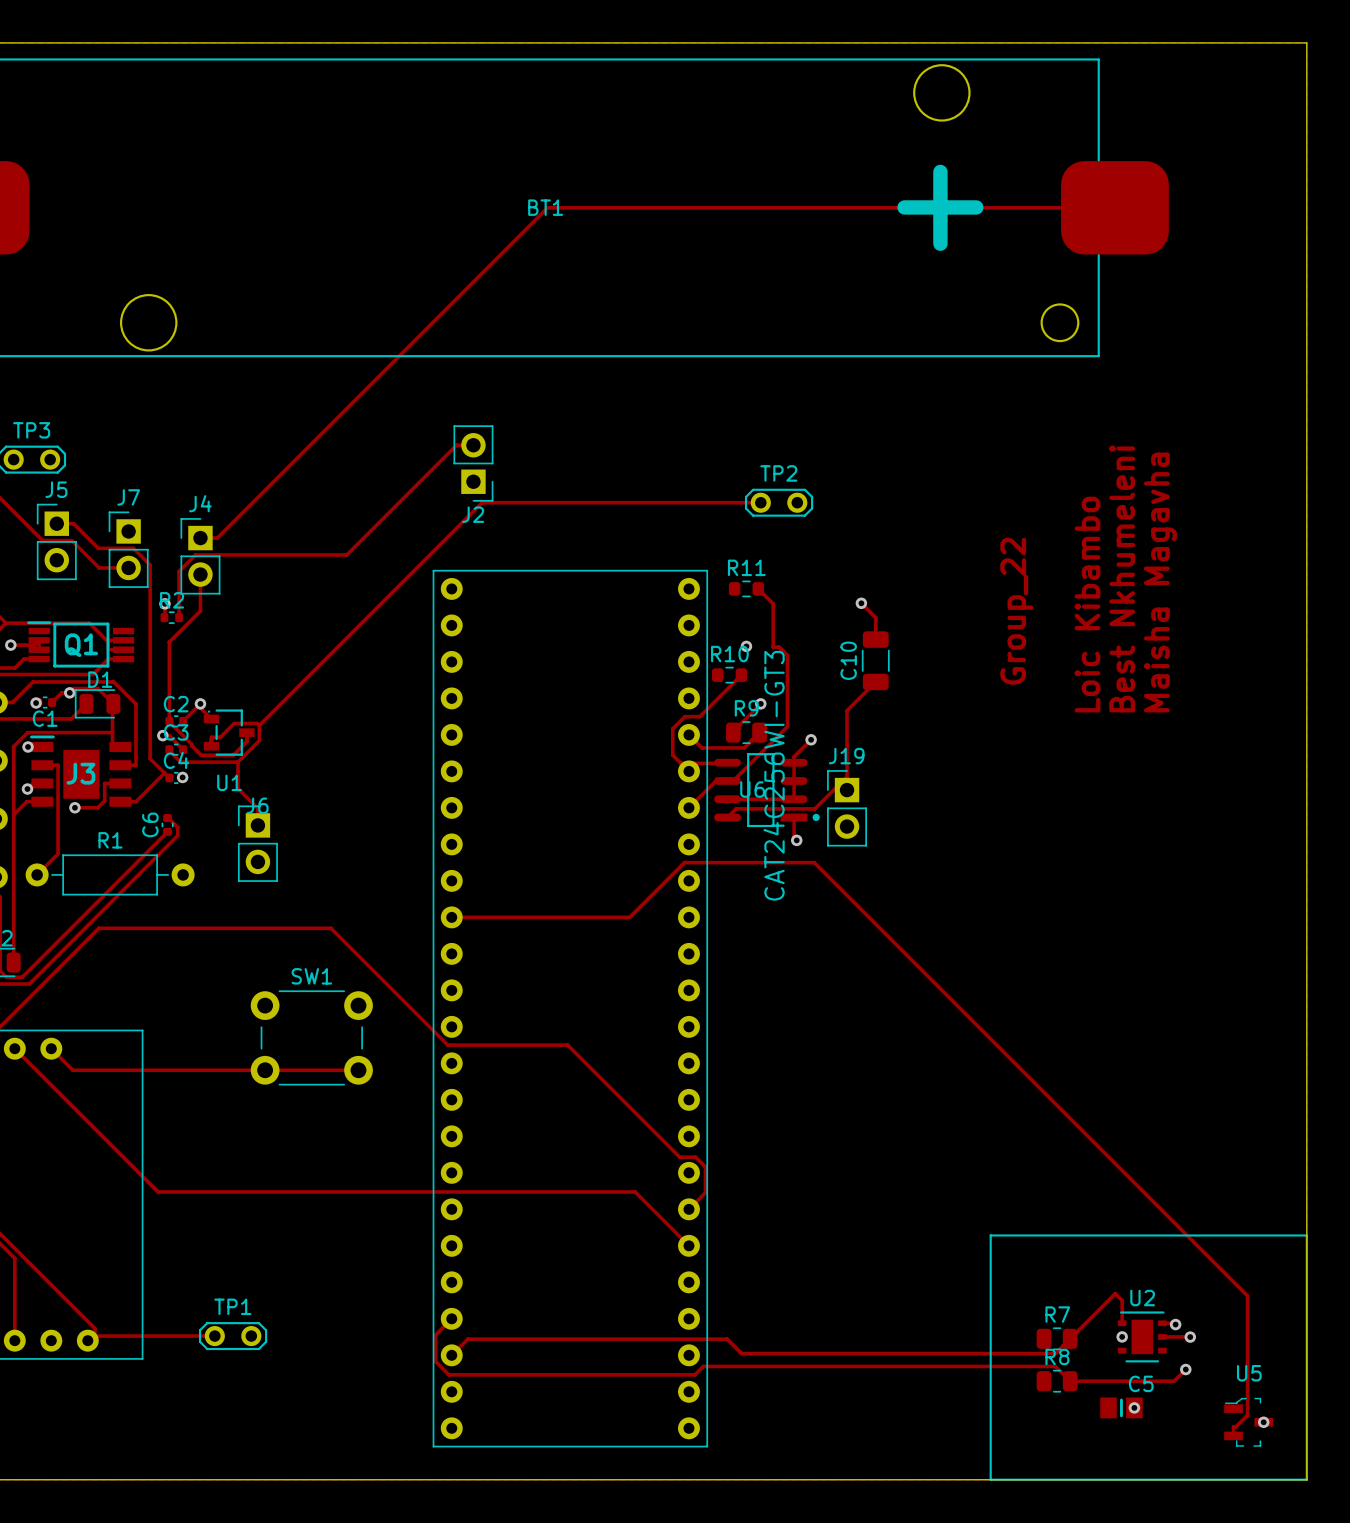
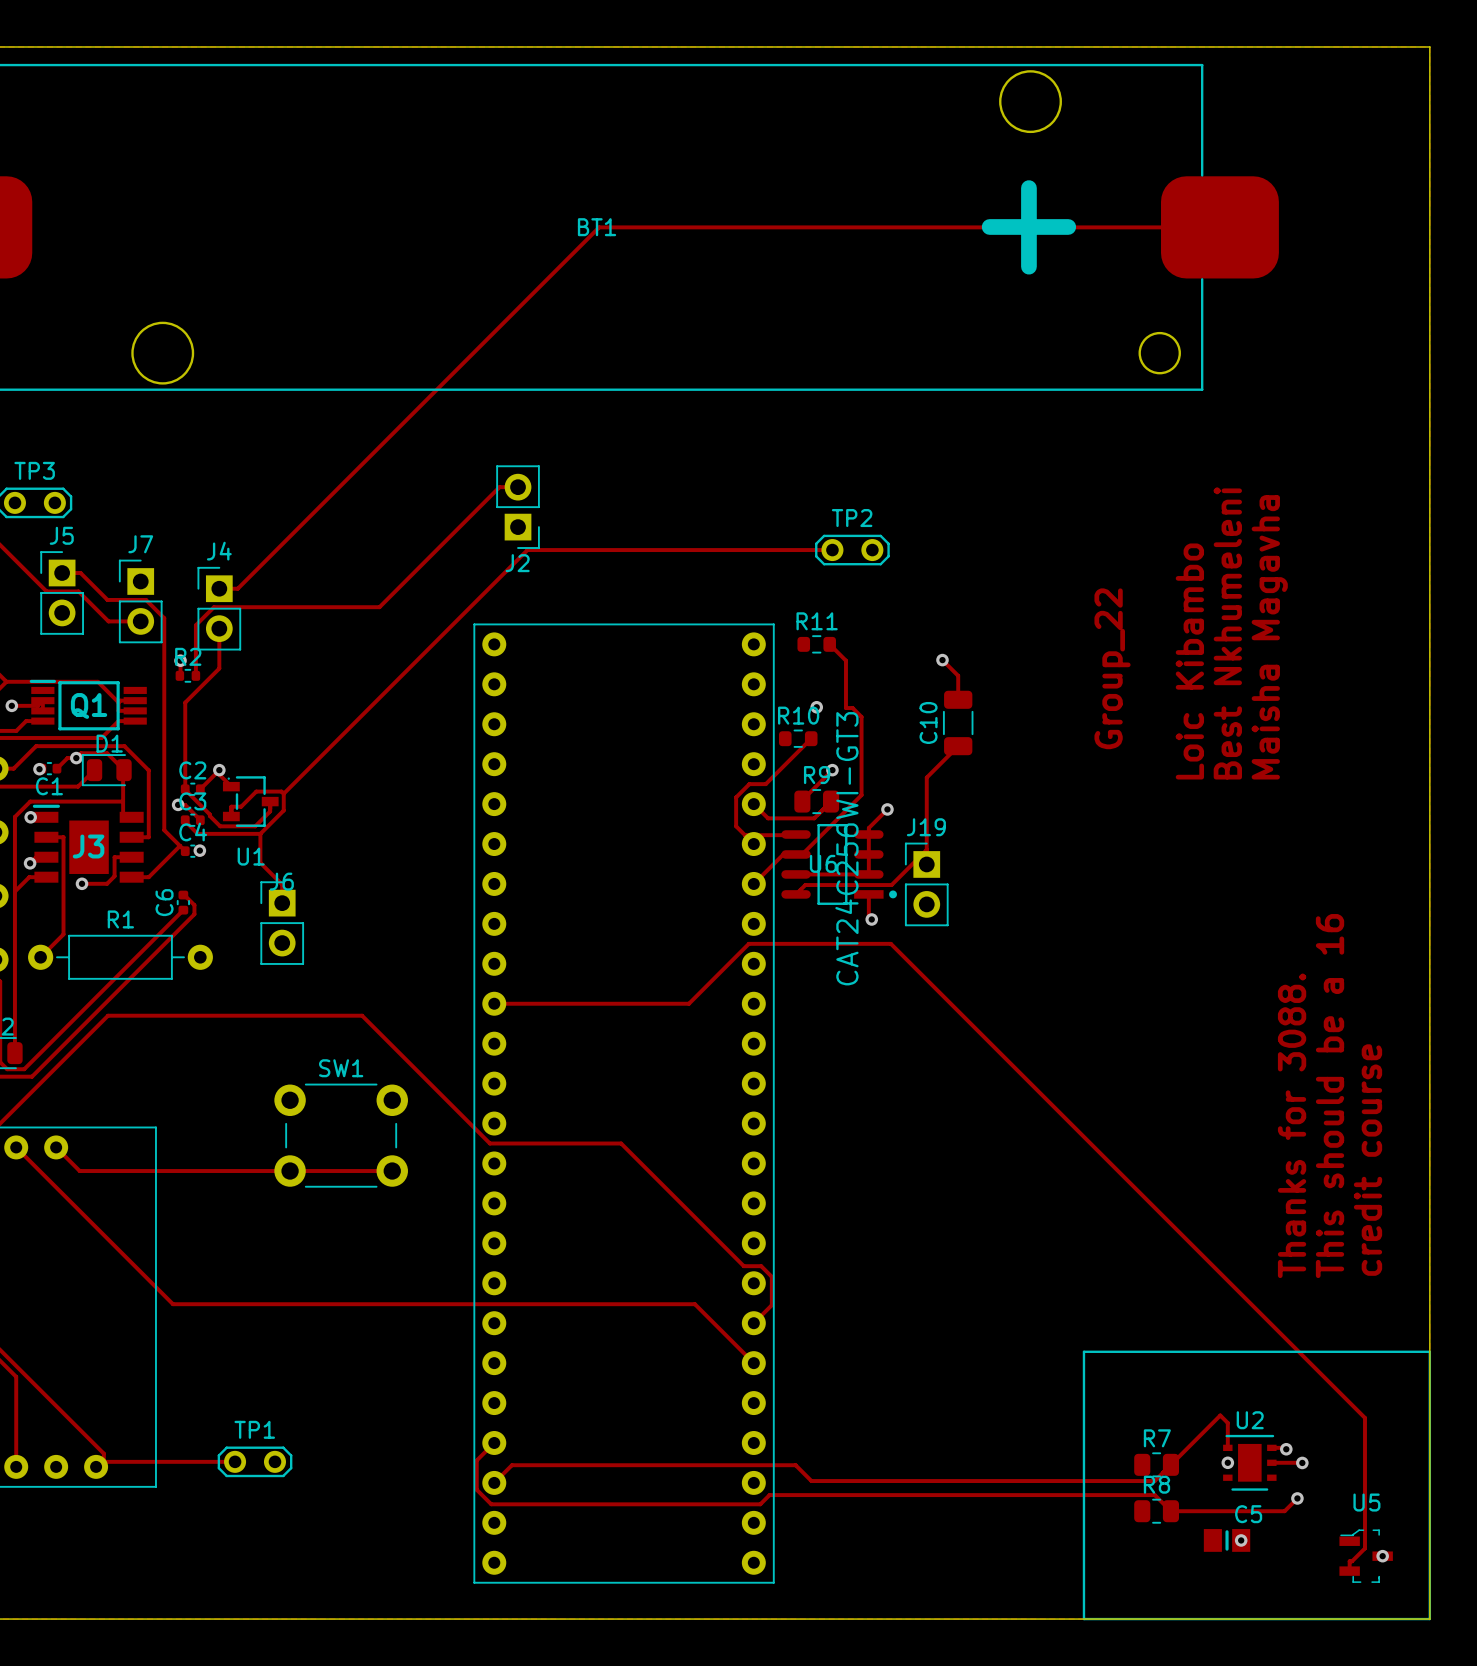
text: none -> This should be a 16 (1330, 1096)
text: none -> Thanks for 3088. (1292, 1125)
text: none -> credit course (1367, 1160)

